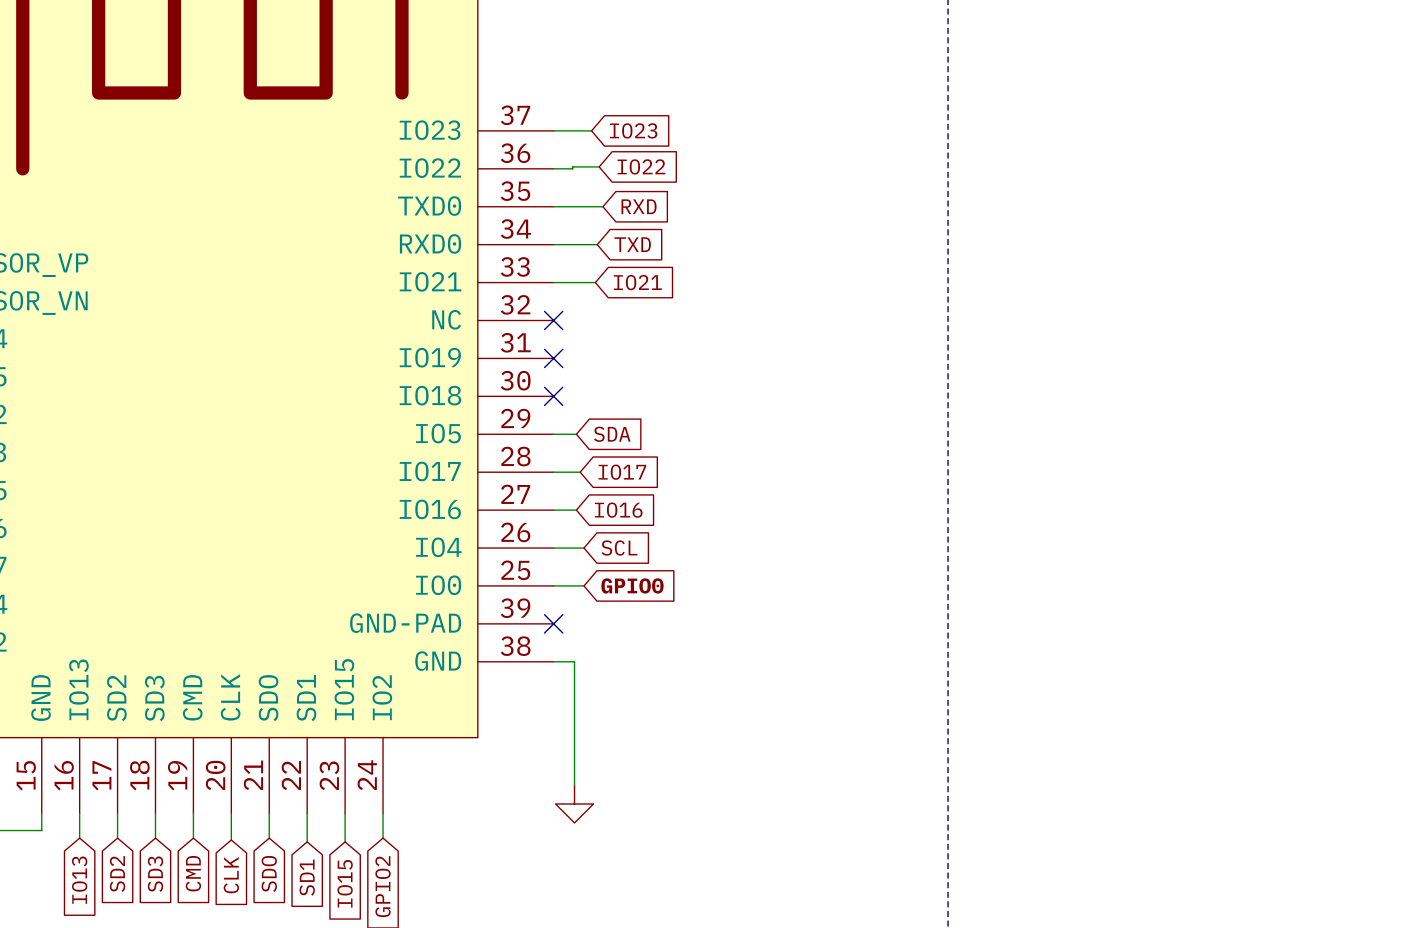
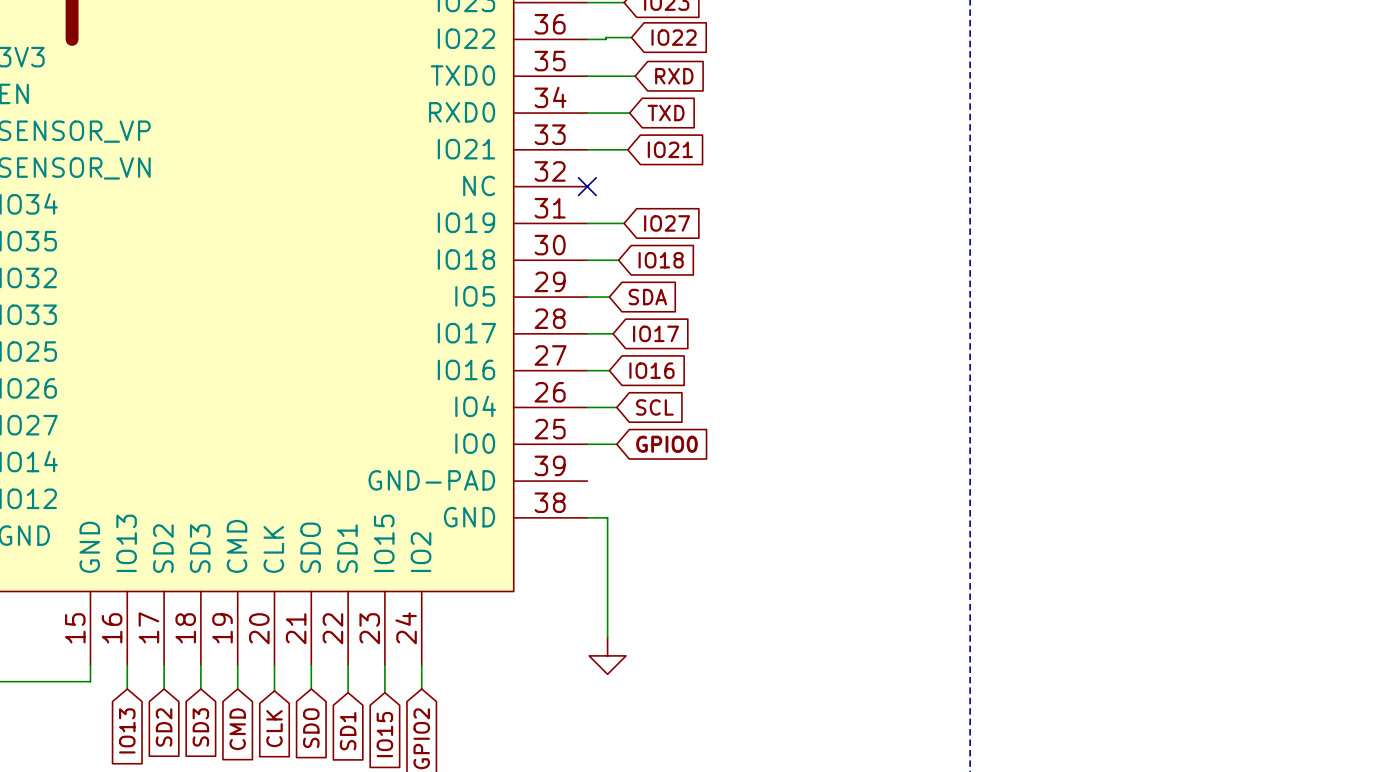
wire: none -> (587, 223) (624, 223)
no-connect mark: (553, 358) -> none
global label: none -> IO27 (667, 223)
wire: none -> (587, 260) (618, 260)
no-connect mark: (553, 396) -> none
global label: none -> IO18 (661, 260)
no-connect mark: (553, 623) -> none

